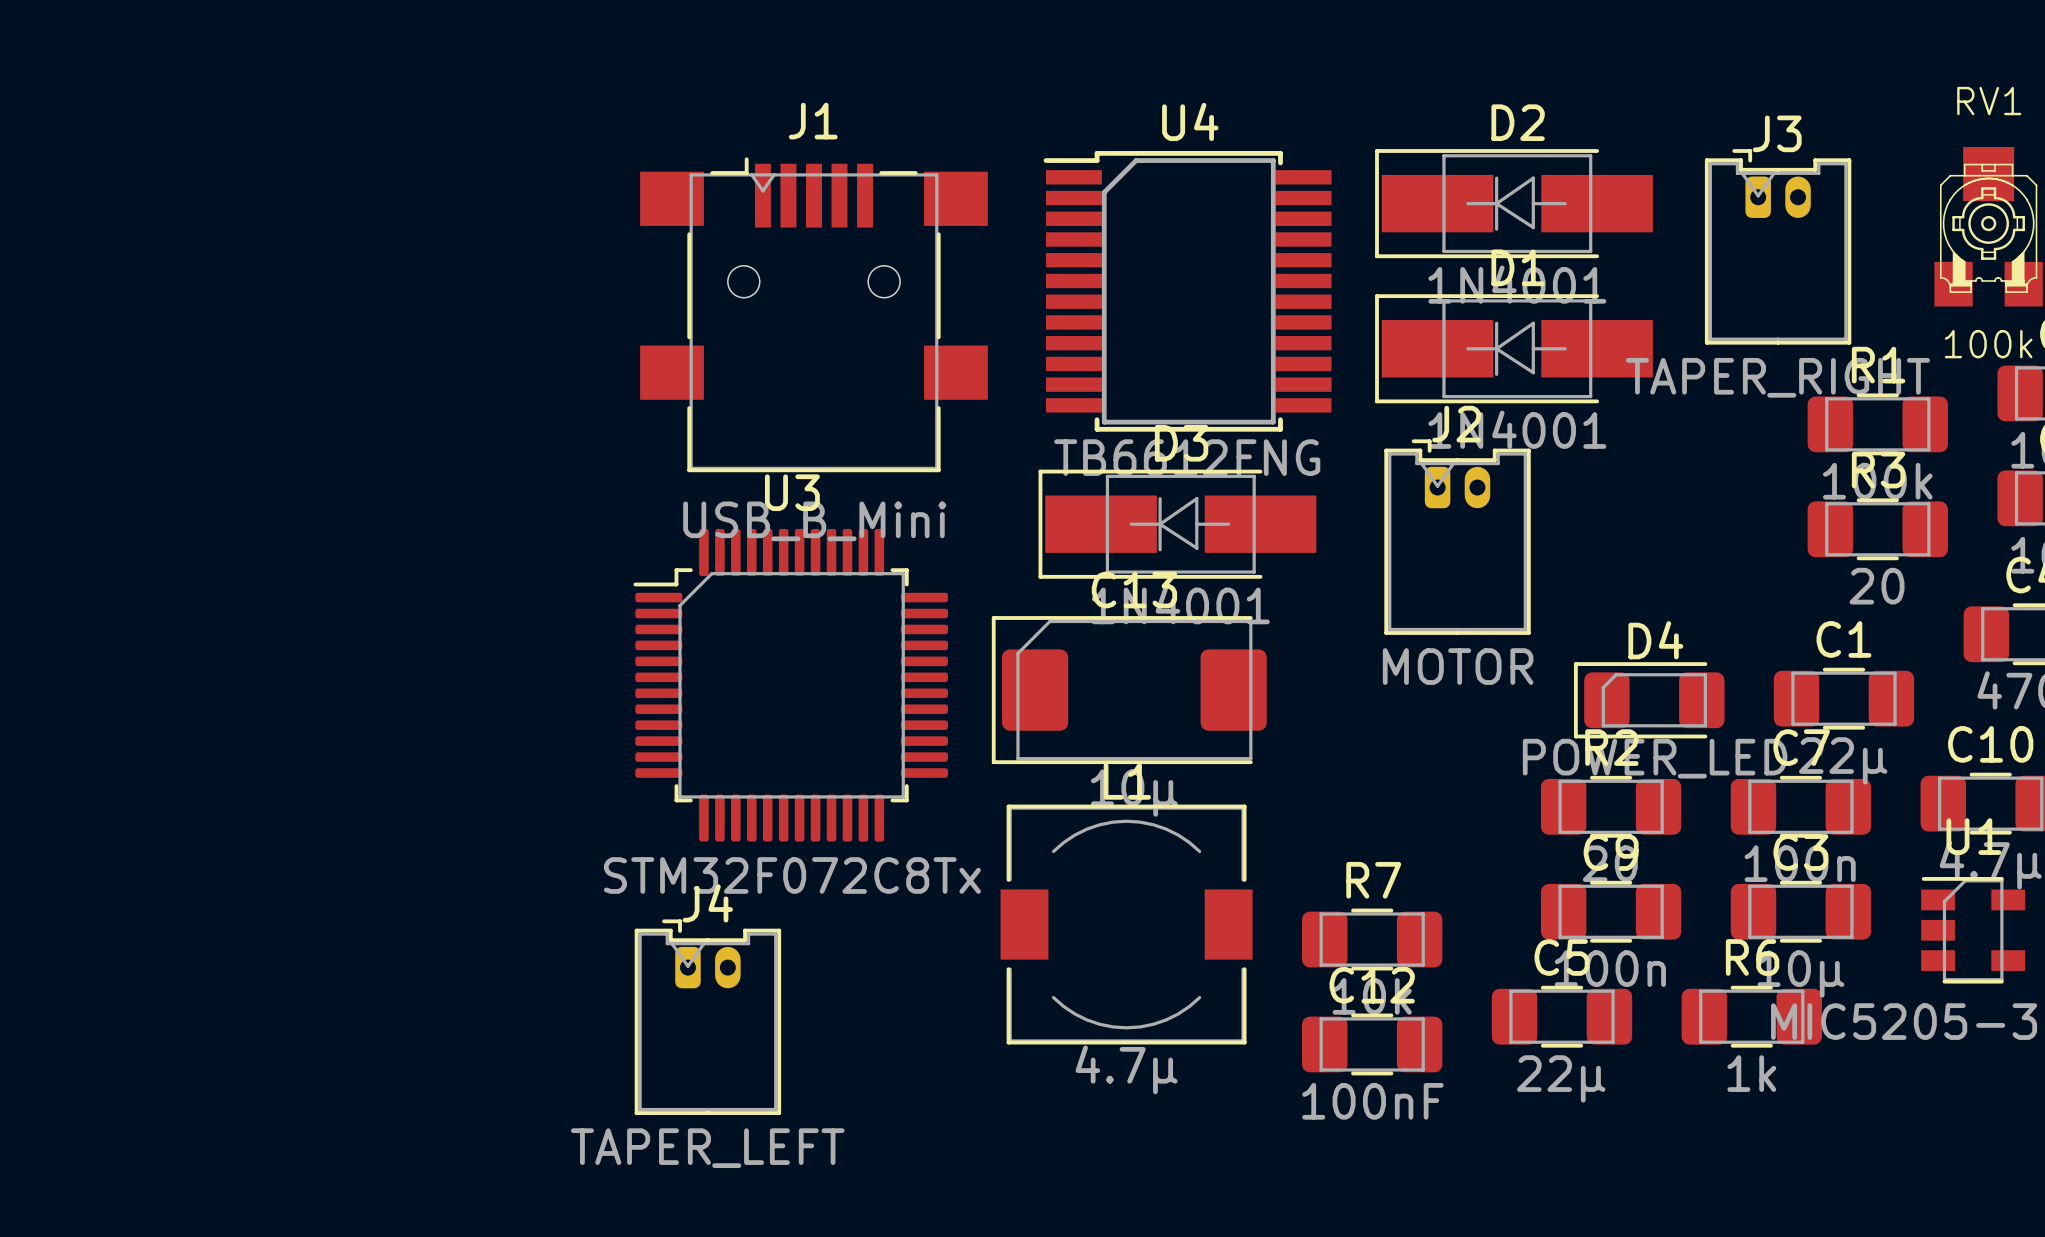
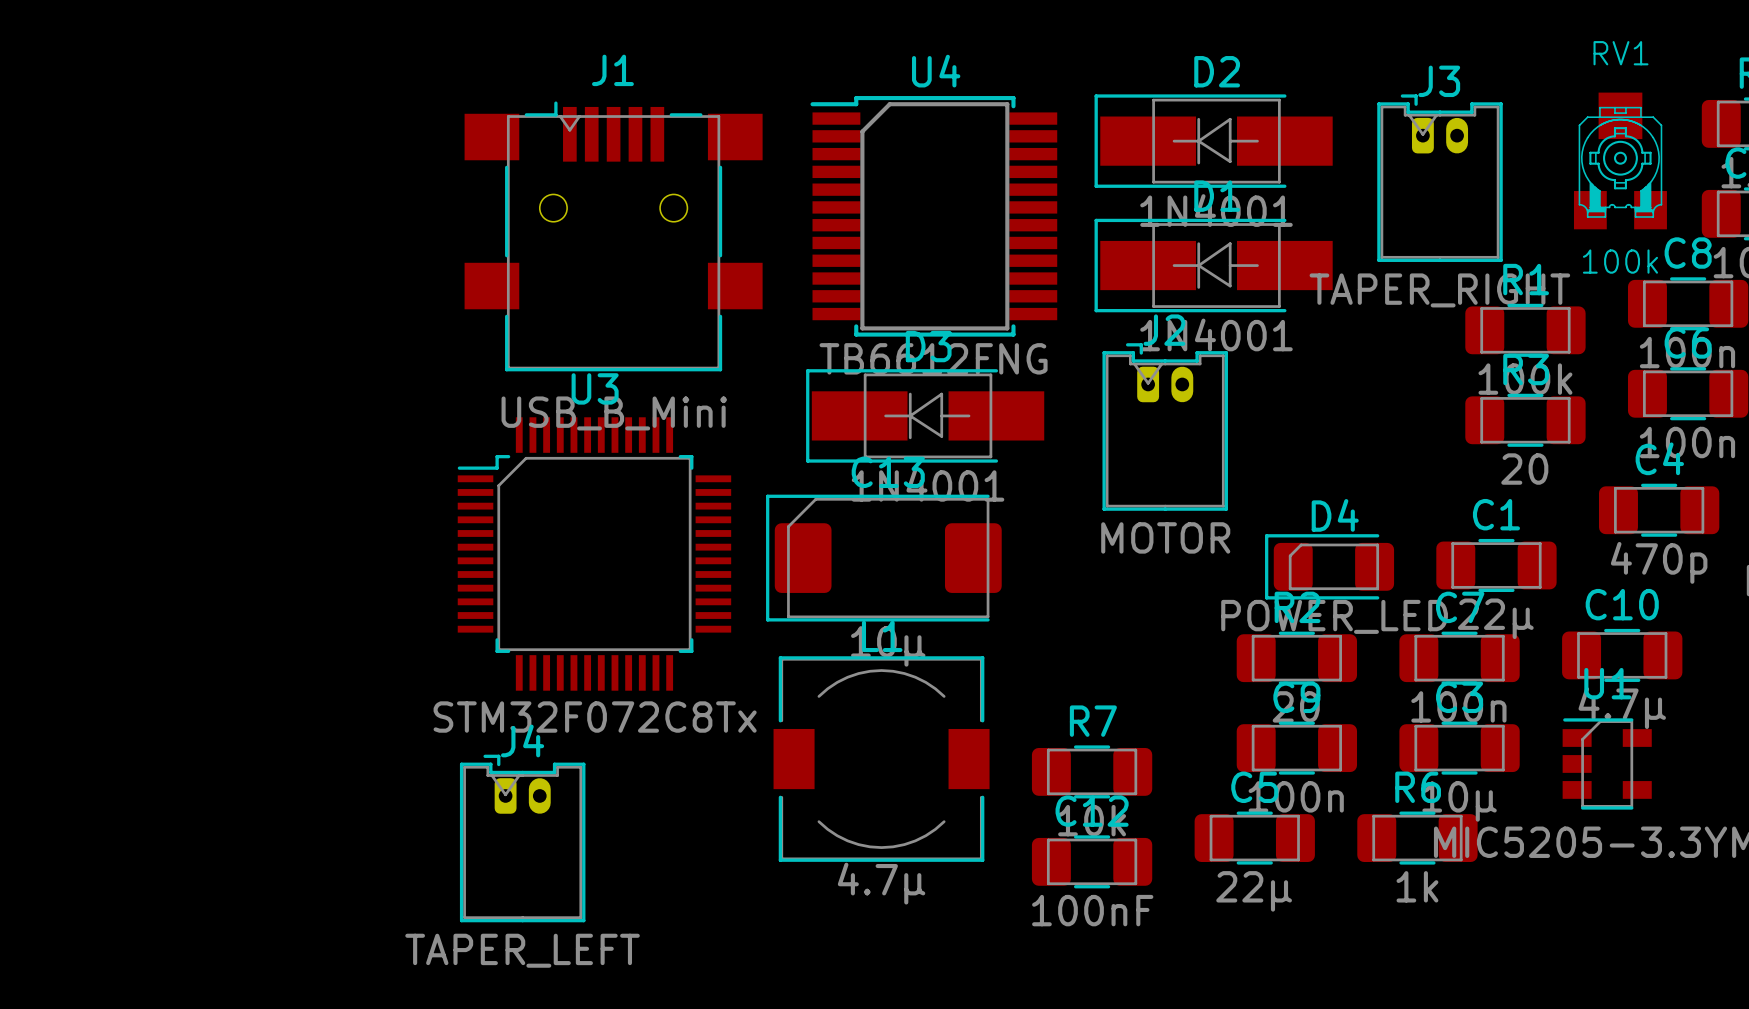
U3 footprint: [633, 528, 948, 842] -> [457, 417, 732, 691]

